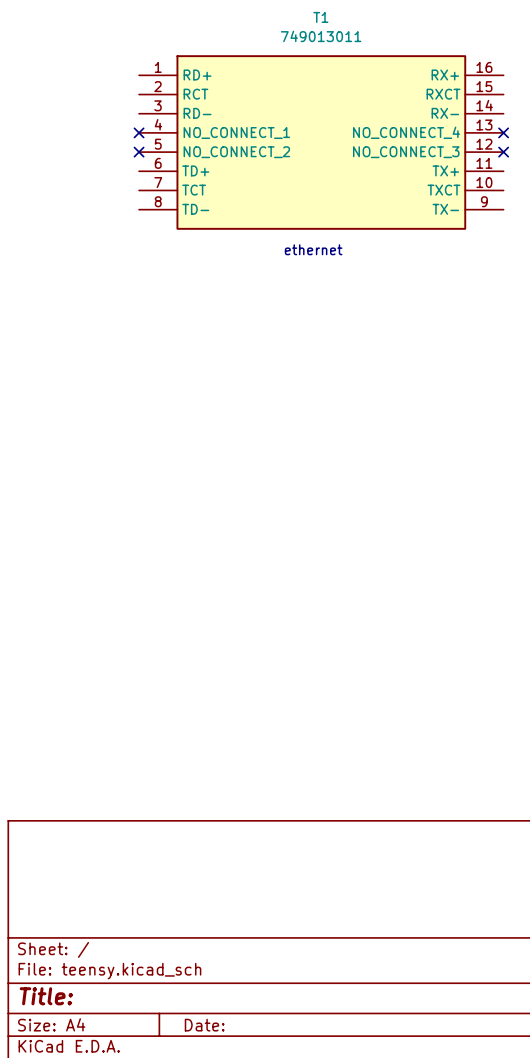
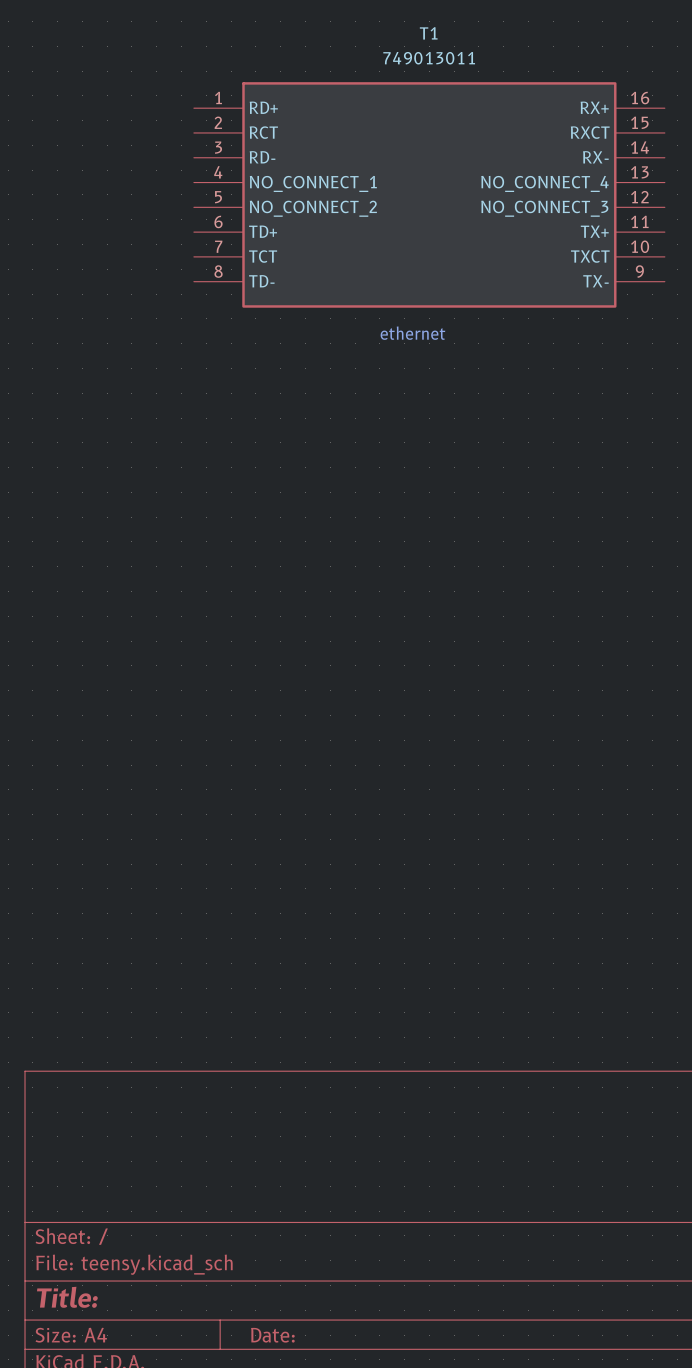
no-connect mark: (139, 132) -> none
no-connect mark: (503, 132) -> none
no-connect mark: (139, 152) -> none
no-connect mark: (503, 152) -> none

